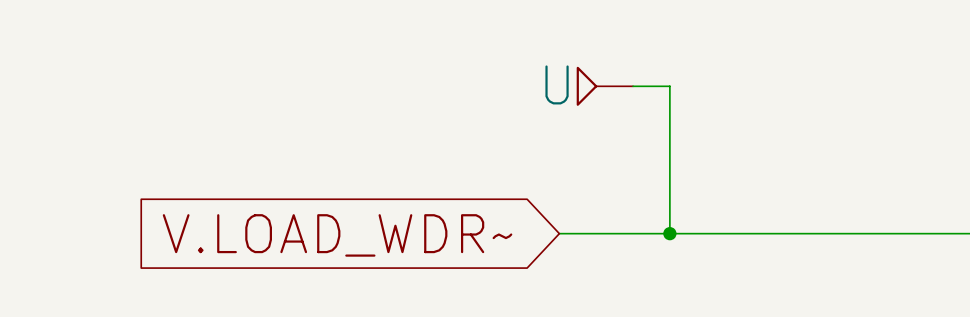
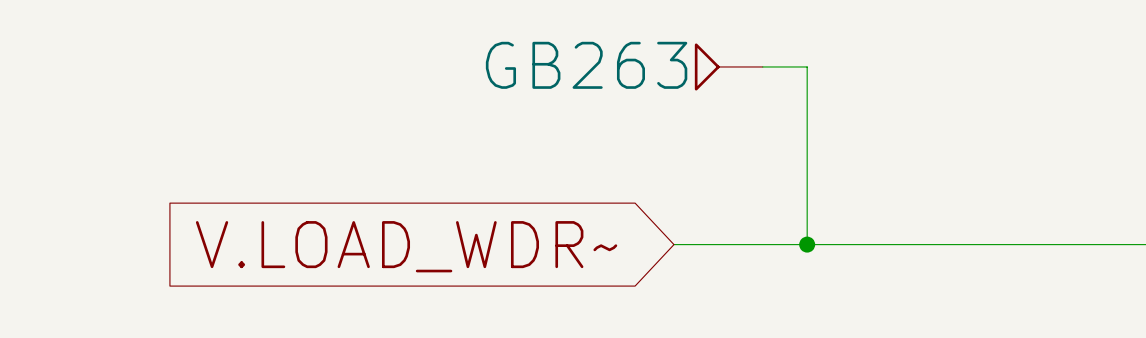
U name: U (557, 84) -> GB263 (586, 65)

